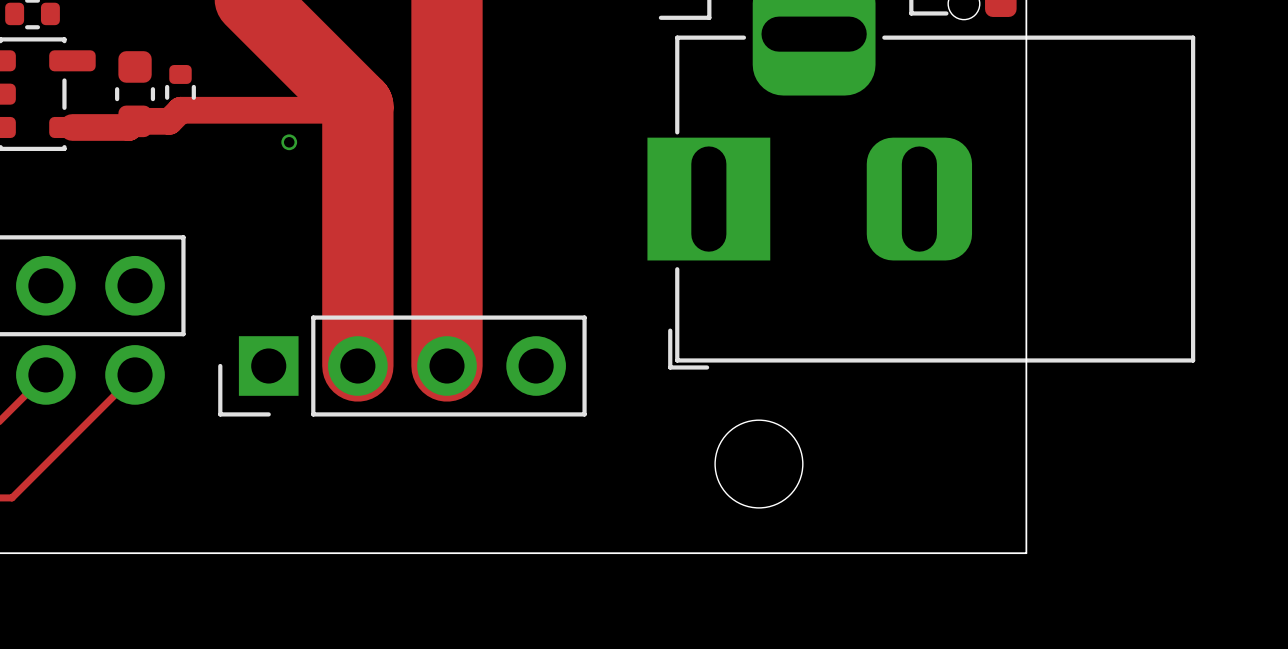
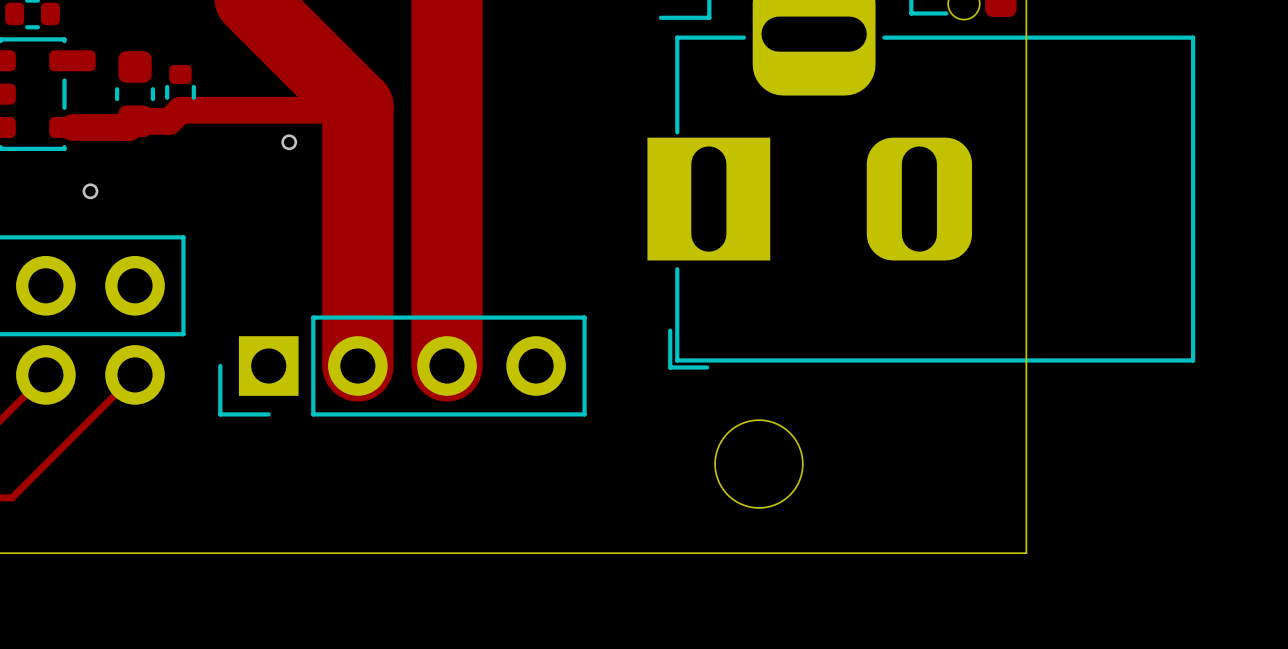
via: none -> (90, 191)

